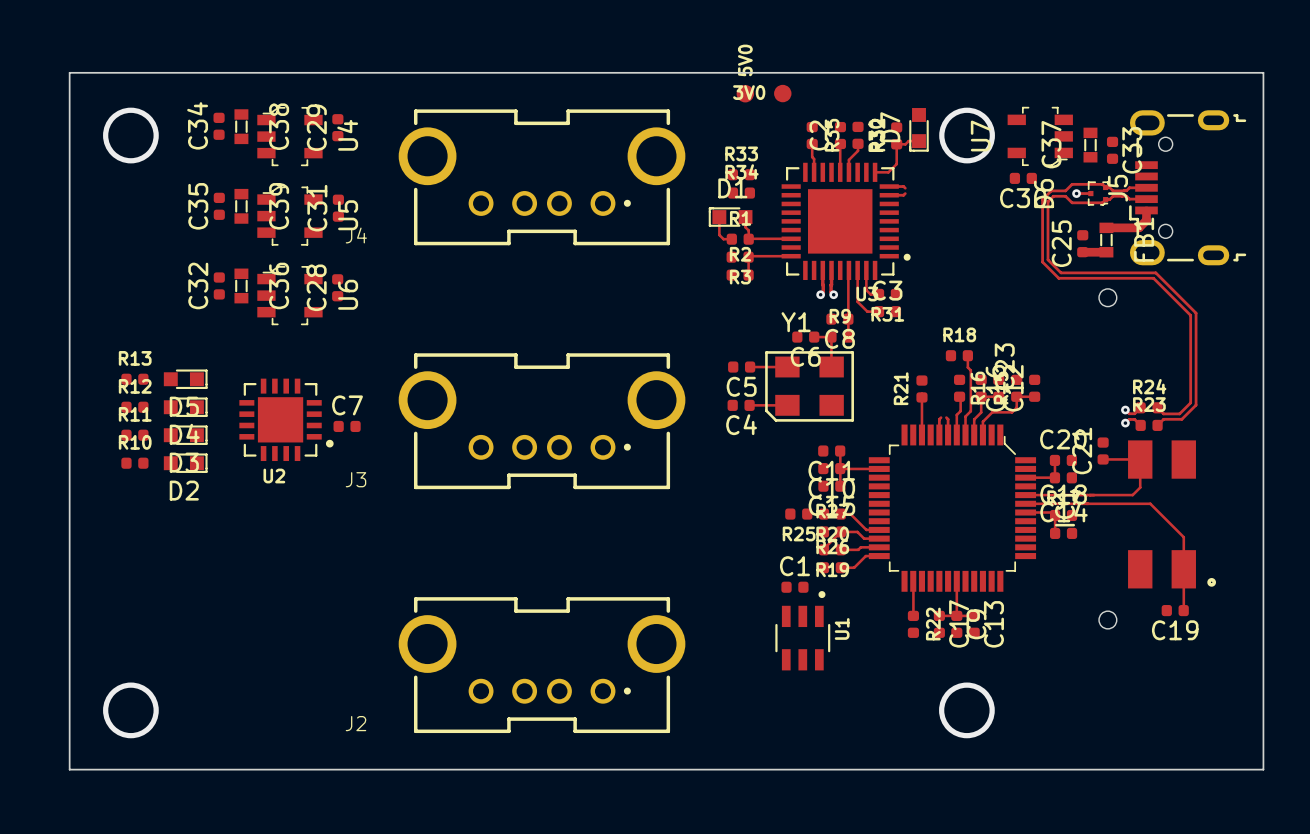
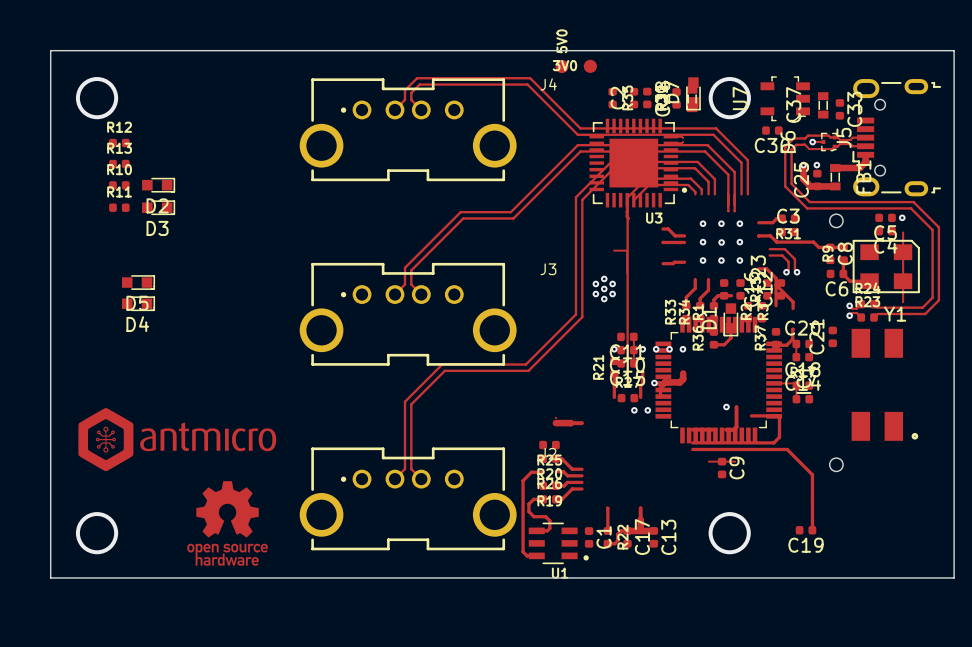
C34: (219, 126) -> none
C38: (241, 126) -> none
C29: (337, 127) -> none
U4: (289, 136) -> none
track: (919, 141) (896, 144) (896, 164) (888, 172) (875, 172) -> none
track: (812, 143) (814, 172) -> none
track: (858, 143) (858, 150) (848, 159) (848, 172) -> none
track: (840, 144) (840, 172) -> none
track: none -> (394, 109) (405, 99) (405, 90) (417, 78) (530, 78) (580, 128) (716, 128) (747, 160) (747, 194)
track: none -> (421, 109) (411, 99) (411, 92) (419, 84) (527, 84) (577, 134) (713, 134) (741, 162) (741, 194)
R33 rotation: 0° (741, 174) -> 90° clockwise (686, 312)
R33 position: (741, 174) -> (686, 312)
J4 rotation: 0° (542, 177) -> 180° (408, 129)
track: (1105, 187) (1102, 184) (1072, 184) (1065, 190) (1051, 190) (1042, 199) (1042, 262) (1058, 278) (1153, 278) (1190, 315) (1190, 402) (1179, 413) (1162, 412) -> (834, 137) (808, 135) (805, 138) (793, 138) (785, 147) (785, 186) (807, 208) (911, 208) (932, 230) (932, 297) (922, 307) (877, 307)
R34 rotation: 0° (741, 193) -> 90° clockwise (700, 312)
R34 position: (741, 193) -> (700, 312)
track: (1065, 196) (1053, 196) (1047, 201) (1047, 259) (1061, 272) (1155, 272) (1196, 313) -> none
C35: (219, 206) -> none
C39: (241, 206) -> none
C31: (338, 208) -> none
U5: (289, 216) -> none
track: (719, 217) (719, 235) (723, 239) (731, 239) -> none
D1 rotation: 0° (730, 217) -> 90° counterclockwise (730, 319)
D1 position: (730, 217) -> (730, 319)
track: (745, 217) (748, 239) (791, 238) -> none
track: none -> (803, 165) (803, 179) (810, 186) (817, 186)
via: none -> (803, 165)
via: none -> (816, 165)
R1 rotation: 0° (740, 239) -> 90° clockwise (713, 312)
R1 position: (740, 239) -> (713, 312)
track: (791, 256) (749, 256) (748, 275) -> none
R3 rotation: 0° (740, 257) -> 90° clockwise (747, 312)
R3 position: (740, 257) -> (747, 312)
track: none -> (695, 194) (688, 185) (649, 185) (633, 200)
track: none -> (701, 194) (701, 189) (690, 178) (646, 178) (627, 197) (627, 385)
track: none -> (708, 194) (708, 181) (695, 168) (613, 168) (582, 199) (582, 317) (528, 370) (444, 370) (411, 404) (411, 469) (421, 479)
track: none -> (714, 194) (714, 179) (697, 161) (611, 161) (575, 197) (575, 314) (525, 364) (442, 364) (405, 401) (405, 469) (394, 479)
track: (822, 270) (823, 292) (820, 294) -> none
track: (848, 270) (848, 337) -> none
track: (857, 270) (857, 301) (867, 311) (879, 311) -> none
track: (866, 270) (866, 290) (870, 294) (879, 294) -> none
C28 footprint: [332, 274, 344, 302] -> [686, 85, 698, 113]
R2 rotation: 0° (740, 275) -> 90° clockwise (761, 312)
R2 position: (740, 275) -> (761, 312)
track: none -> (728, 211) (728, 174) (705, 151) (580, 151) (513, 218) (463, 218) (411, 270) (411, 284) (421, 294)
track: none -> (734, 211) (734, 172) (707, 145) (577, 145) (510, 212) (460, 212) (405, 267) (405, 284) (394, 294)
C32: (219, 285) -> none
C36: (241, 285) -> none
via: none -> (902, 217)
via: (820, 294) -> none
via: (833, 294) -> none
R31 position: (887, 294) -> (788, 218)
track: none -> (782, 218) (776, 218) (772, 222) (758, 222)
U6: (289, 295) -> none
via: none -> (703, 223)
via: none -> (721, 223)
via: none -> (739, 223)
track: none -> (662, 229) (668, 229) (675, 235) (684, 235)
C3 position: (887, 311) -> (788, 232)
track: none -> (759, 236) (770, 235) (776, 242) (813, 242) (818, 247) (843, 247)
C8 rotation: 0° (839, 319) -> 90° clockwise (830, 253)
C8 position: (839, 319) -> (830, 253)
via: none -> (703, 242)
via: none -> (739, 242)
track: none -> (663, 242) (684, 242)
via: none -> (721, 242)
track: none -> (769, 249) (784, 249) (794, 259) (794, 270) (797, 272)
C6 position: (805, 337) -> (836, 273)
R9 rotation: 0° (839, 337) -> 90° clockwise (843, 253)
R9 position: (839, 337) -> (843, 253)
track: none -> (769, 255) (782, 255) (788, 261) (788, 270) (786, 272)
track: none -> (843, 260) (843, 274) (850, 281) (869, 281) (865, 285)
via: none -> (703, 260)
via: none -> (721, 260)
via: none -> (739, 260)
track: none -> (684, 262) (663, 263)
R18: (959, 355) -> none
track: (967, 355) (967, 367) (970, 370) (970, 411) (965, 416) (965, 434) -> none
track: none -> (758, 268) (766, 268) (776, 278) (776, 305)
via: none -> (786, 272)
via: none -> (797, 272)
C5 position: (741, 367) -> (885, 217)
track: (750, 367) (787, 367) -> none
via: none -> (604, 278)
track: none -> (695, 279) (695, 288) (686, 297) (686, 305)
track: none -> (708, 279) (708, 290) (700, 298) (700, 305)
R13 position: (134, 379) -> (119, 164)
via: none -> (595, 283)
via: none -> (612, 283)
track: none -> (776, 284) (793, 302) (793, 308)
Y1 rotation: 0° (809, 386) -> 180° (886, 266)
Y1 position: (809, 386) -> (886, 266)
via: none -> (604, 288)
R21 position: (921, 388) -> (614, 367)
R16: (998, 388) -> none
track: (921, 393) (921, 434) -> none
via: none -> (595, 294)
via: none -> (612, 294)
track: (960, 396) (960, 411) (956, 414) (956, 434) -> none
track: none -> (731, 295) (718, 295) (713, 299) (713, 305)
track: (998, 396) (981, 396) (981, 412) (974, 419) (974, 434) -> none
track: (1034, 396) (1016, 396) (1016, 407) (1012, 412) (992, 412) (982, 421) (982, 434) -> none
via: none -> (604, 299)
C4 position: (741, 405) -> (885, 231)
track: (749, 405) (787, 405) -> none
track: (1196, 405) (1181, 419) (1162, 420) -> (805, 144) (796, 144) (791, 149) (791, 183) (809, 202) (913, 202) (938, 227) (938, 300) (925, 313) (877, 313)
R12 position: (134, 407) -> (119, 143)
track: (941, 417) (939, 434) -> none
track: (946, 417) (948, 434) -> none
U2: (286, 419) -> none
J3 rotation: 0° (542, 421) -> 180° (408, 314)
C7: (347, 426) -> none
R11 position: (134, 435) -> (119, 207)
D3 position: (185, 435) -> (158, 207)
track: none -> (730, 328) (730, 338) (724, 344) (713, 344)
track: none -> (793, 329) (792, 339) (786, 345) (776, 345)
R37: none -> (776, 338)
R36: none -> (713, 338)
track: (1103, 459) (1140, 459) -> (751, 415) (779, 415)
track: (1140, 459) (1140, 487) (1132, 495) (1025, 495) -> (779, 415) (779, 437) (773, 442) (692, 442)
R10 position: (134, 463) -> (119, 185)
D2 position: (185, 463) -> (158, 185)
via: none -> (614, 349)
via: none -> (642, 349)
via: none -> (656, 349)
via: none -> (669, 349)
via: none -> (682, 349)
track: (840, 468) (879, 468) -> none
track: (1025, 477) (1054, 477) -> none
track: none -> (642, 373) (640, 397)
track: none -> (683, 373) (683, 379) (679, 382) (664, 382) (660, 386) (660, 397)
track: none -> (614, 374) (614, 397)
track: (1025, 503) (1150, 503) (1183, 537) (1183, 610) -> (692, 449) (787, 449) (812, 474) (812, 530)
via: none -> (654, 383)
R25 position: (798, 514) -> (549, 445)
R20 position: (832, 514) -> (549, 458)
track: (840, 514) (850, 514) (866, 529) (879, 529) -> none
track: (879, 538) (864, 538) (857, 531) (840, 531) (823, 549) -> none
via: none -> (726, 407)
track: none -> (736, 407) (736, 427) (733, 429) (726, 429)
drawing: none -> [78, 408, 277, 566]
track: (879, 547) (840, 549) -> none
via: none -> (634, 410)
via: none -> (647, 410)
R19 position: (832, 549) -> (549, 485)
track: (879, 556) (865, 556) (854, 567) (840, 567) -> none
track: none -> (555, 417) (556, 418)
track: none -> (555, 423) (570, 423)
track: none -> (570, 423) (582, 423)
R26 position: (832, 567) -> (549, 499)
track: none -> (692, 429) (713, 429)
track: (913, 581) (913, 615) -> none
track: (956, 581) (956, 615) -> none
C1 rotation: 0° (794, 587) -> 90° clockwise (589, 537)
C1 position: (794, 587) -> (589, 537)
C19 position: (1175, 610) -> (805, 530)
track: none -> (555, 458) (561, 458) (572, 469) (582, 469)
R22 position: (913, 624) -> (607, 537)
C17 position: (939, 624) -> (627, 537)
C13 position: (974, 624) -> (653, 537)
track: none -> (543, 472) (531, 472) (523, 480) (523, 551) (527, 555) (536, 555)
track: none -> (556, 471) (563, 471) (567, 475) (582, 475)
U1 rotation: 0° (802, 630) -> 90° clockwise (558, 543)
U1 position: (802, 630) -> (558, 543)
track: none -> (582, 482) (567, 482) (564, 485) (557, 485)
track: none -> (582, 489) (572, 489) (562, 499) (556, 499)
J2 rotation: 0° (542, 665) -> 180° (408, 498)
track: none -> (543, 499) (533, 499) (528, 504) (528, 511) (533, 516) (545, 516) (549, 520) (549, 528) (547, 530) (536, 530)
track: none -> (607, 508) (607, 530)
track: none -> (640, 508) (640, 530)
track: none -> (653, 530) (620, 530) (617, 534) (617, 540) (614, 543) (607, 543)

